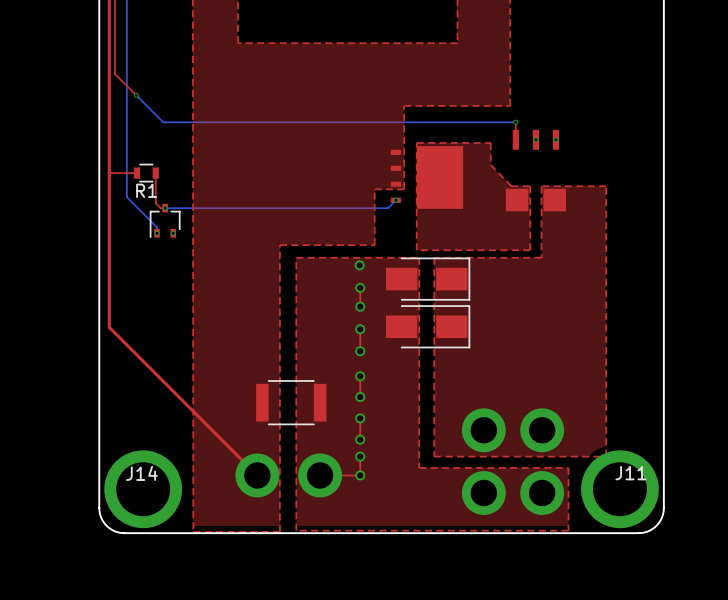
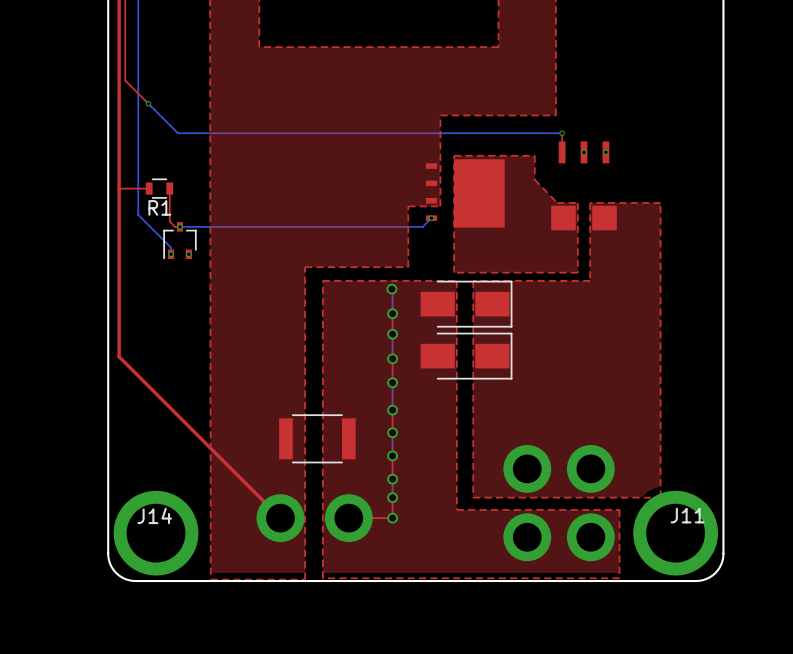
bottom track: none -> (392, 289) (392, 313)
bottom track: none -> (392, 334) (392, 358)
bottom track: none -> (392, 382) (392, 410)
bottom track: none -> (392, 432) (392, 455)
bottom track: none -> (392, 479) (392, 497)

